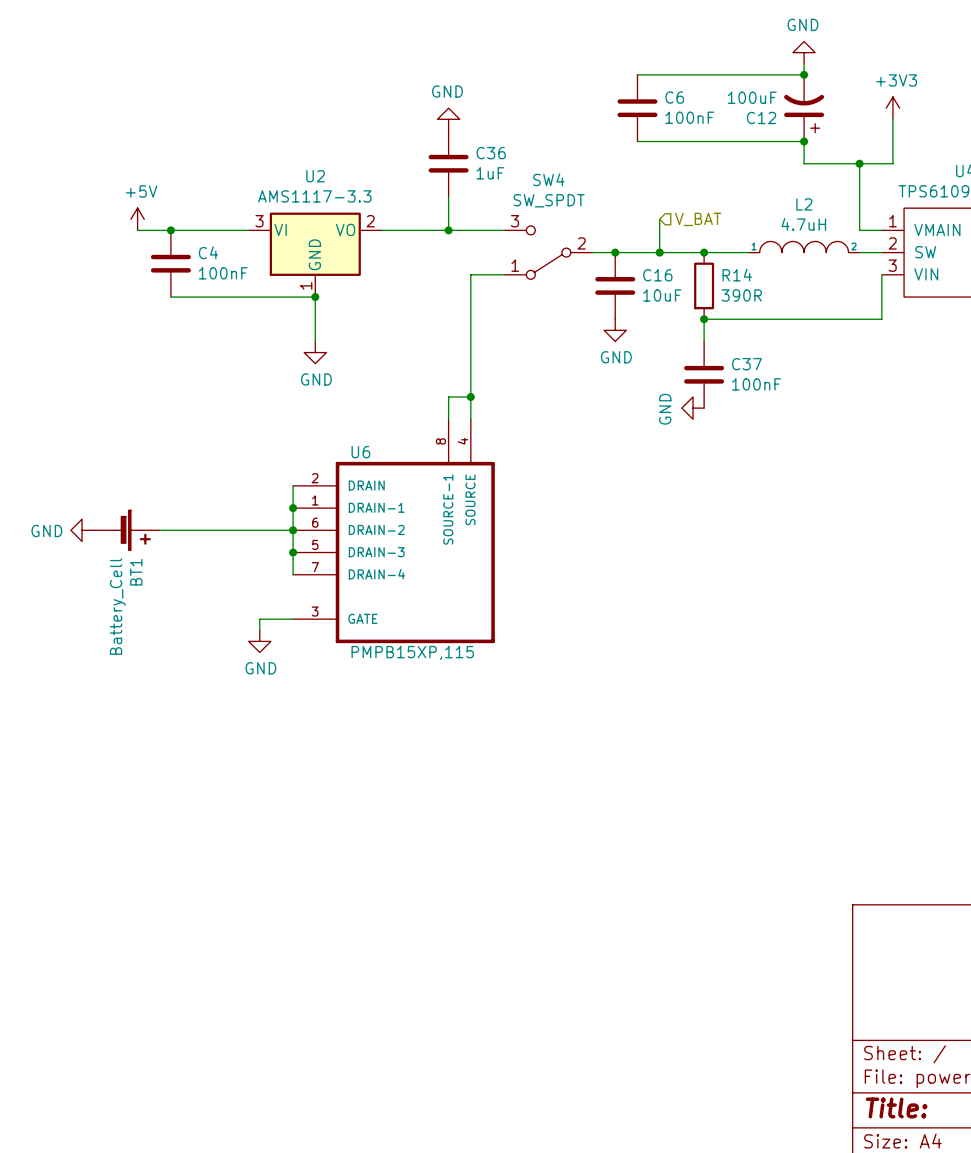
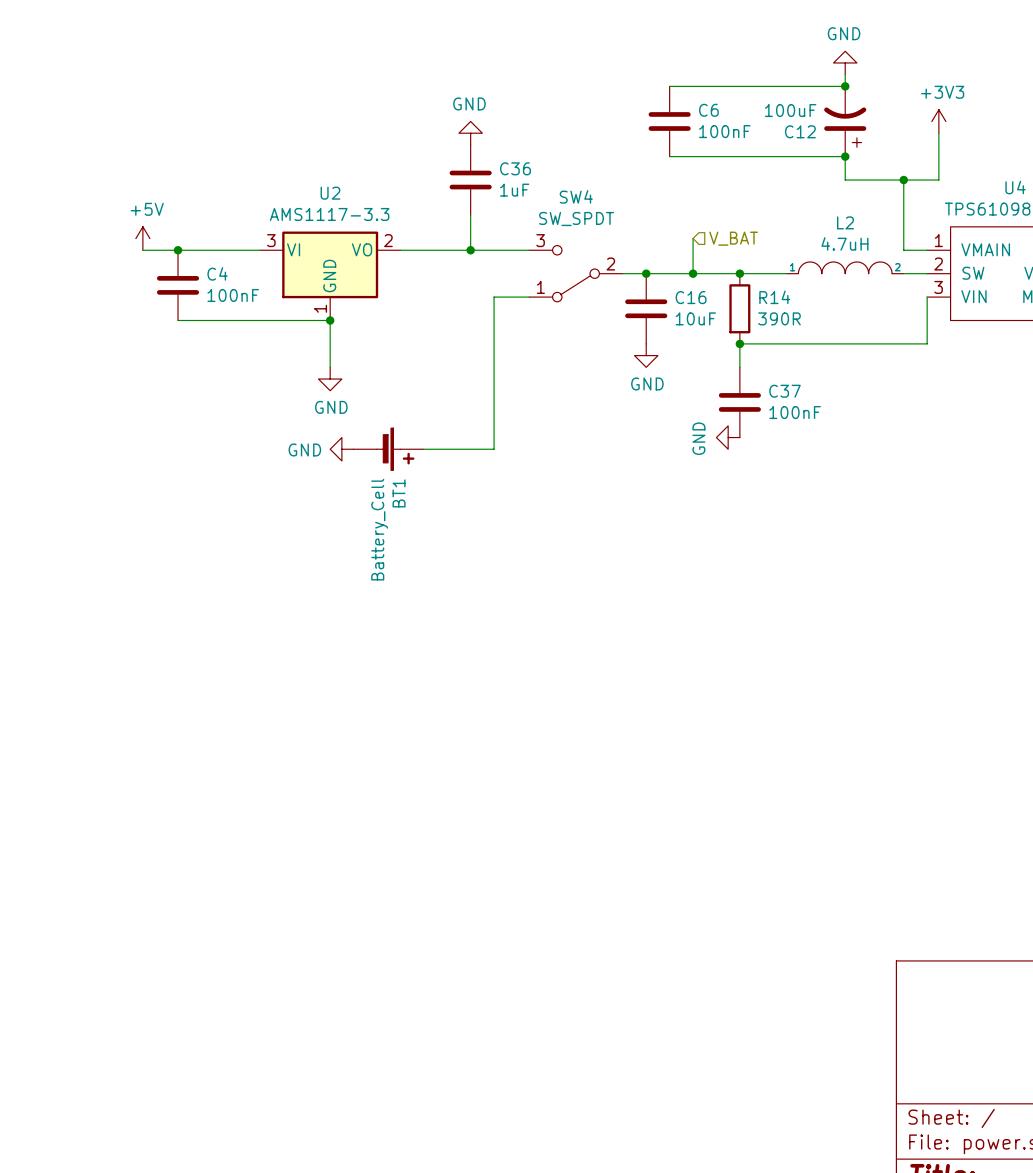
wire: (470, 397) (448, 397) (448, 419) -> none
junction: (470, 397) -> none
power symbol: none -> GND (341, 449)
wire: none -> (423, 449) (494, 449)
wire: (293, 485) (293, 574) -> none
junction: (293, 508) -> none
power symbol: GND (82, 530) -> none
BT1 position: (126, 530) -> (388, 449)
wire: (159, 530) (293, 530) -> none
junction: (293, 530) -> none
U6: PMPB15XP,115 (393, 531) -> none
junction: (293, 552) -> none
wire: (293, 619) (259, 619) (259, 630) -> none
power symbol: GND (259, 641) -> none

